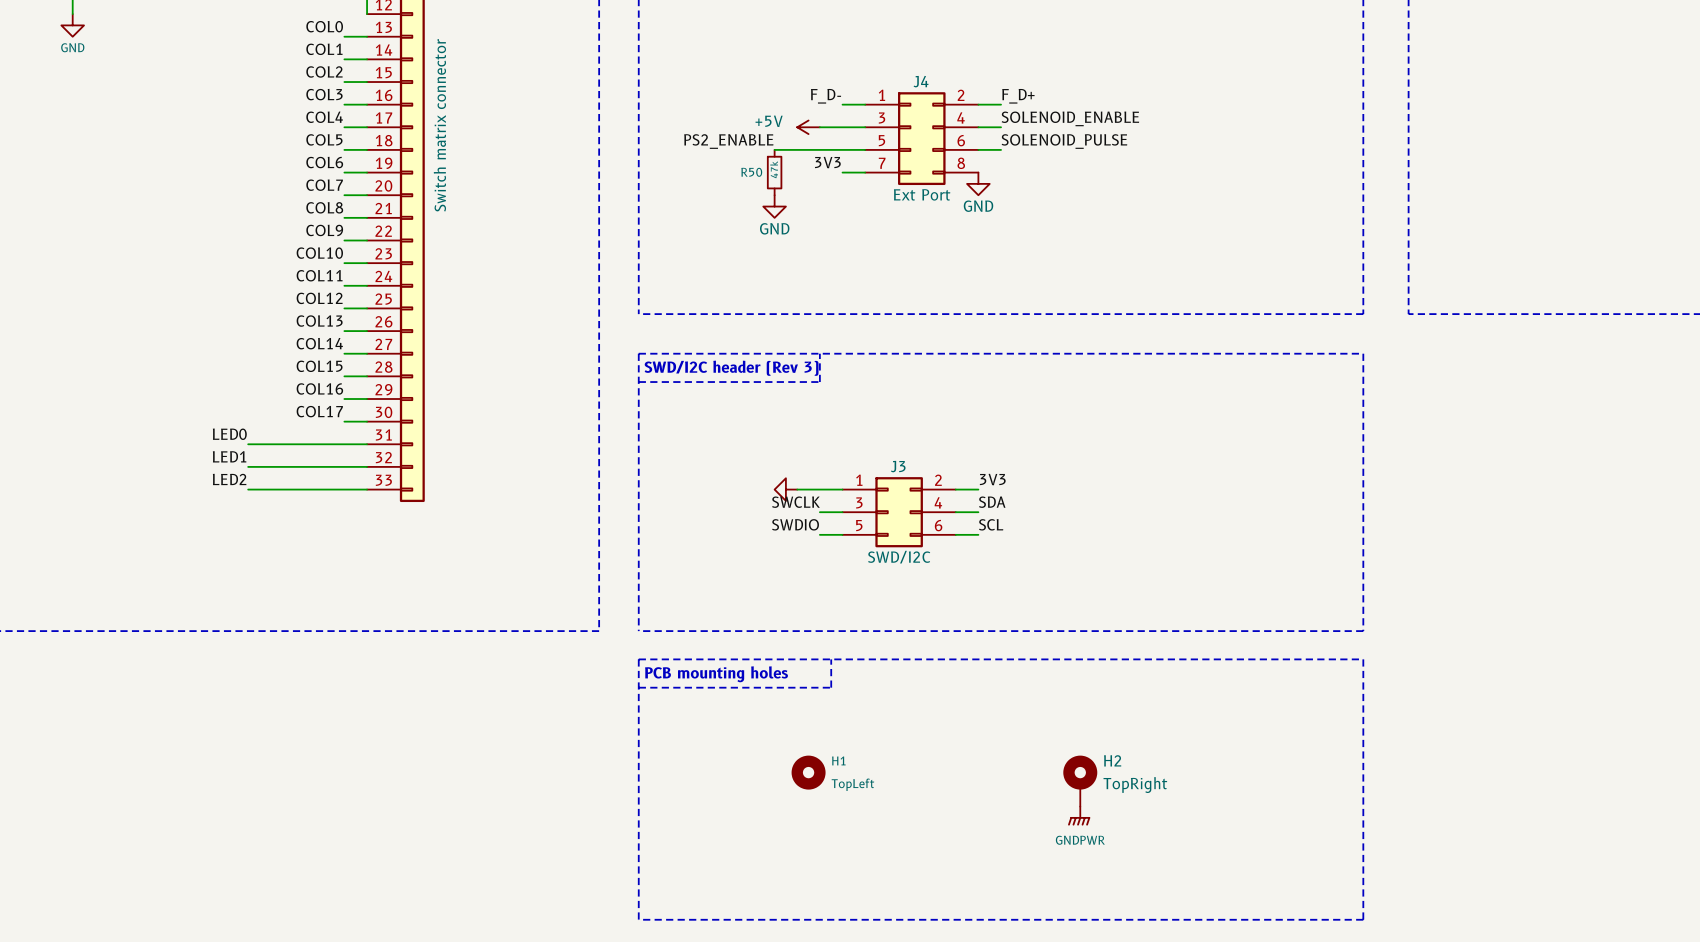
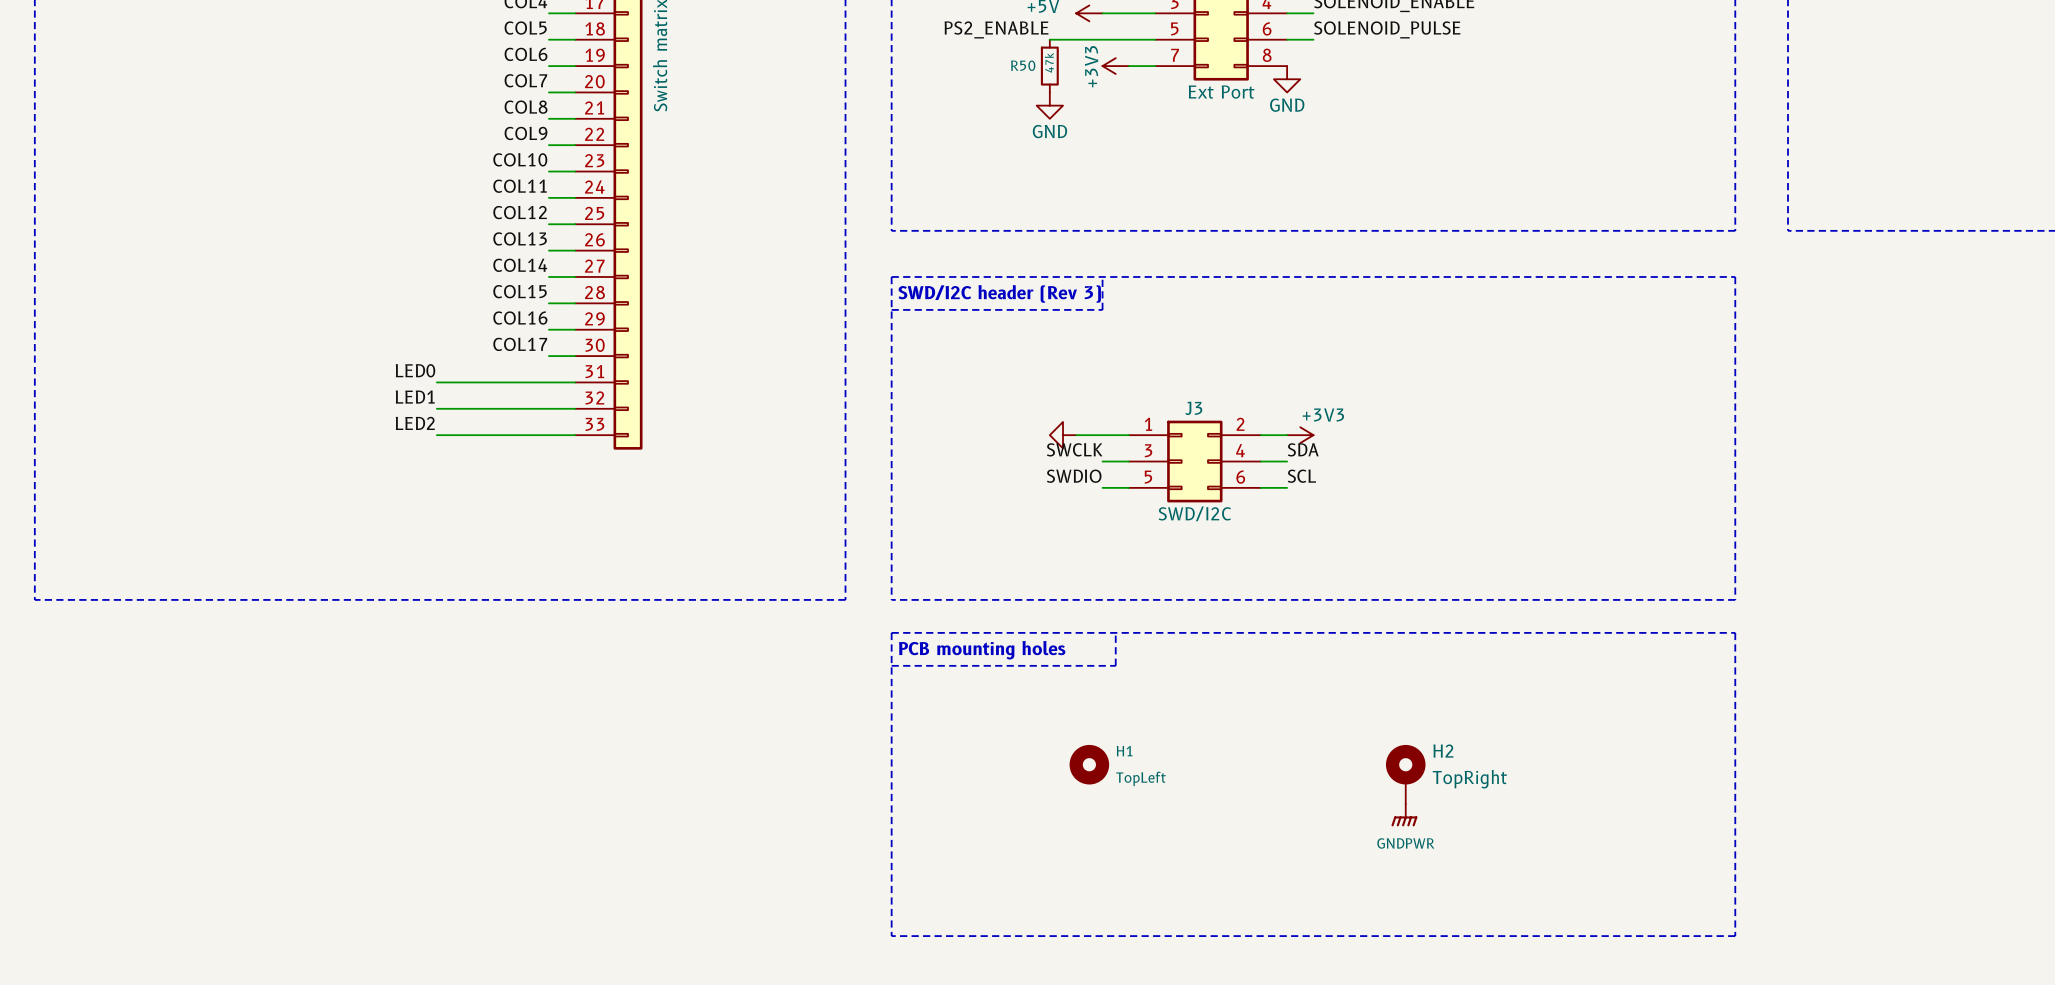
label: 3V3 (827, 162) -> none
power symbol: none -> +3V3 (1115, 66)
label: 3V3 (992, 479) -> none
power symbol: none -> +3V3 (1300, 435)

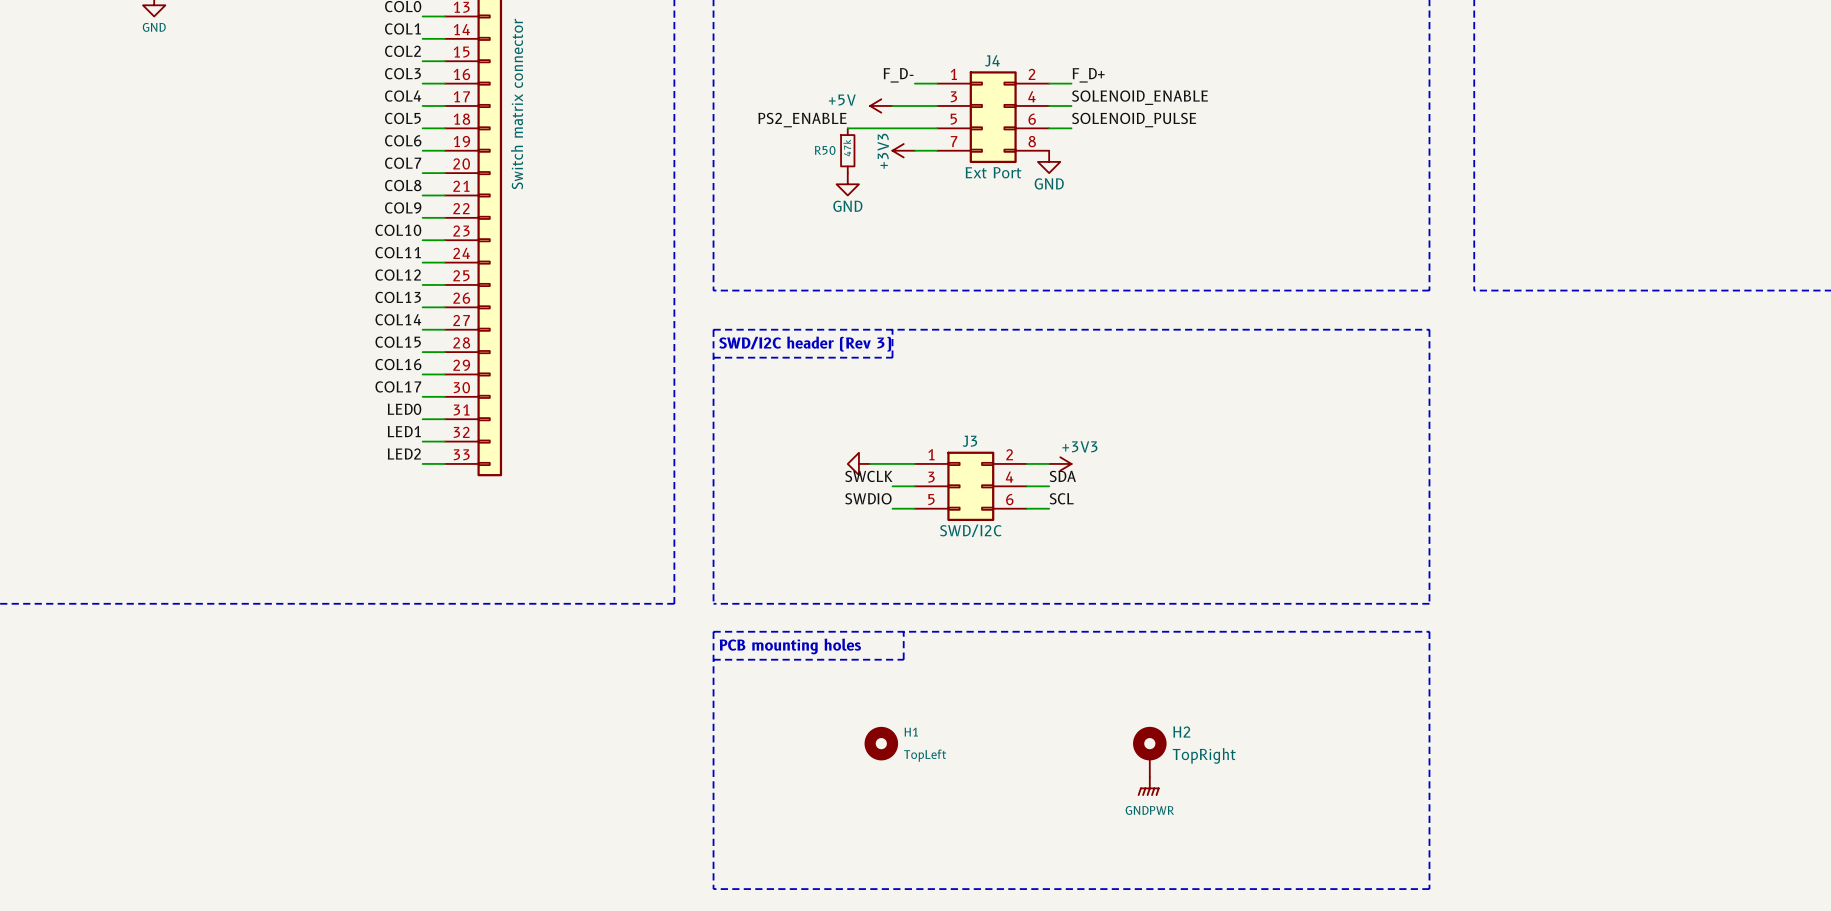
label position: LED0 (415, 370) -> LED0 (404, 409)
wire: (436, 382) (548, 382) -> none
label position: LED1 (415, 397) -> LED1 (404, 431)
wire: (436, 408) (548, 408) -> none
label position: LED2 (415, 423) -> LED2 (404, 453)
wire: (436, 435) (548, 435) -> none

